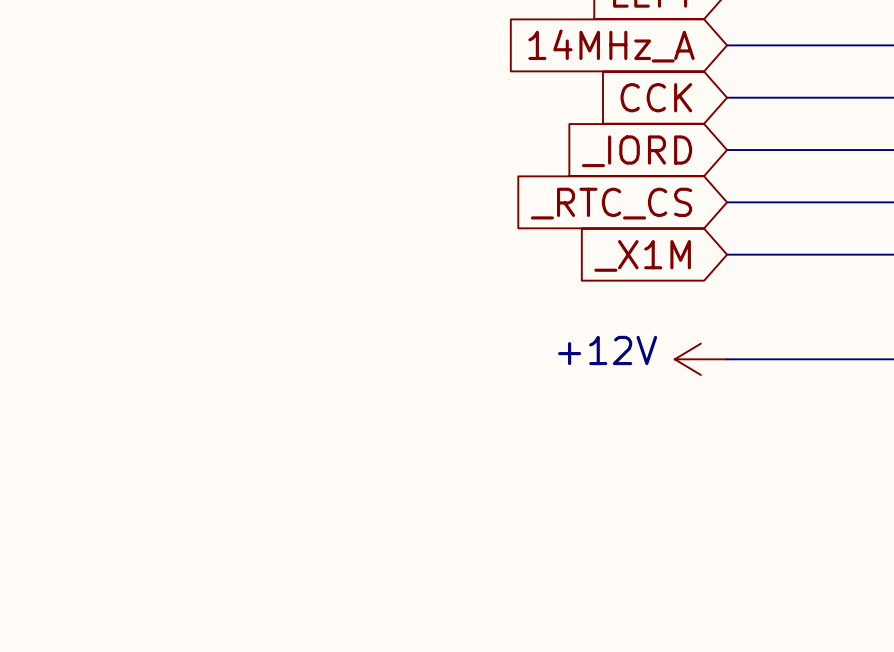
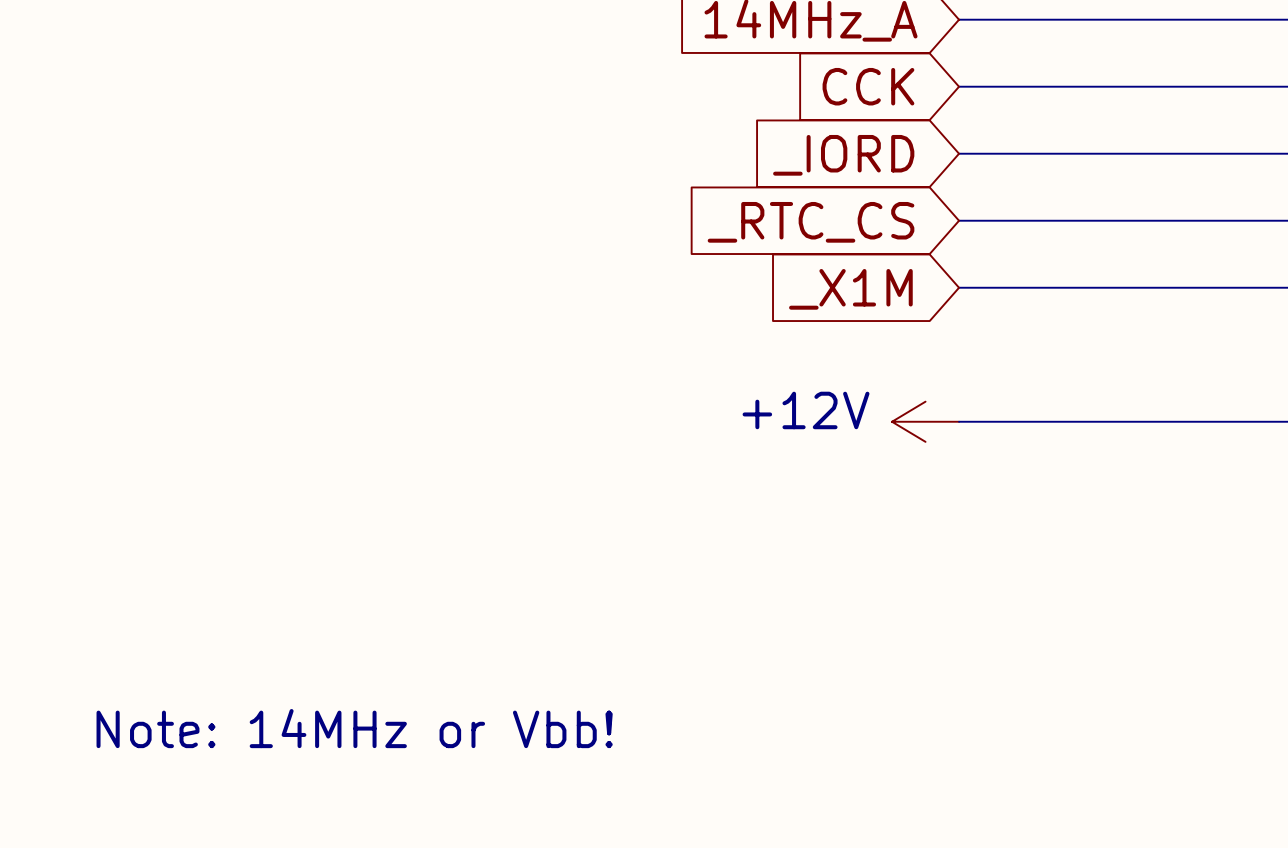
text: none -> Note: 14MHz or Vbb! (354, 728)

